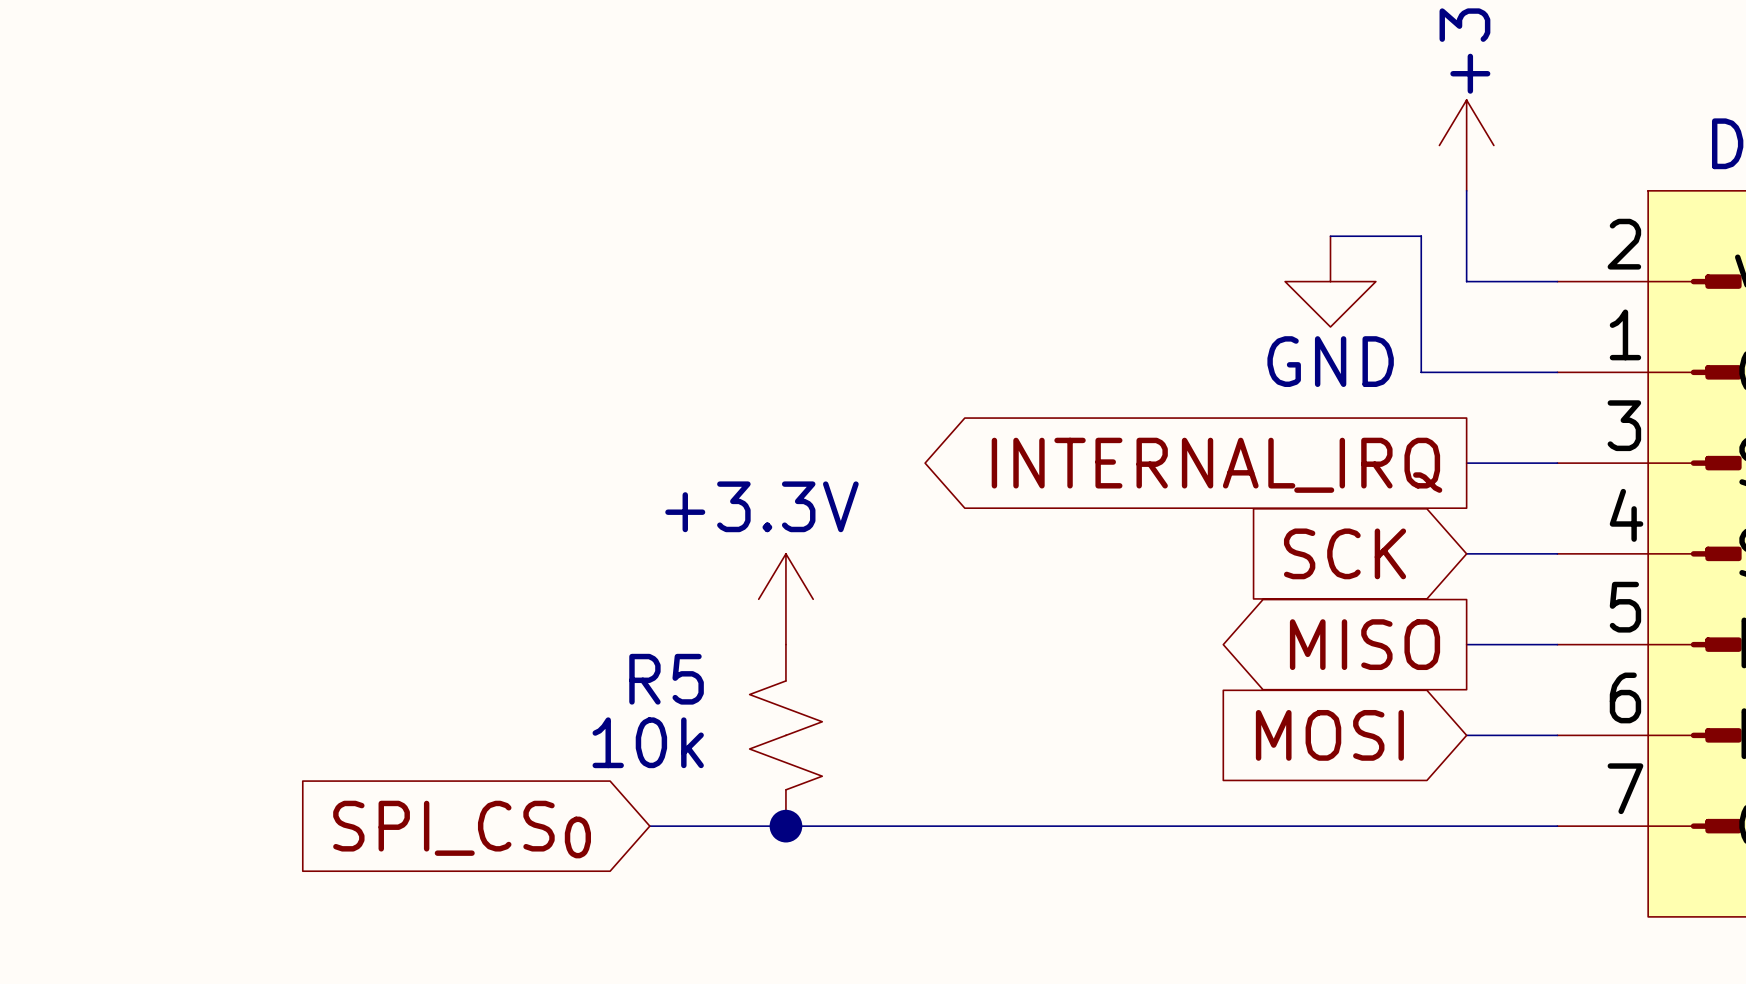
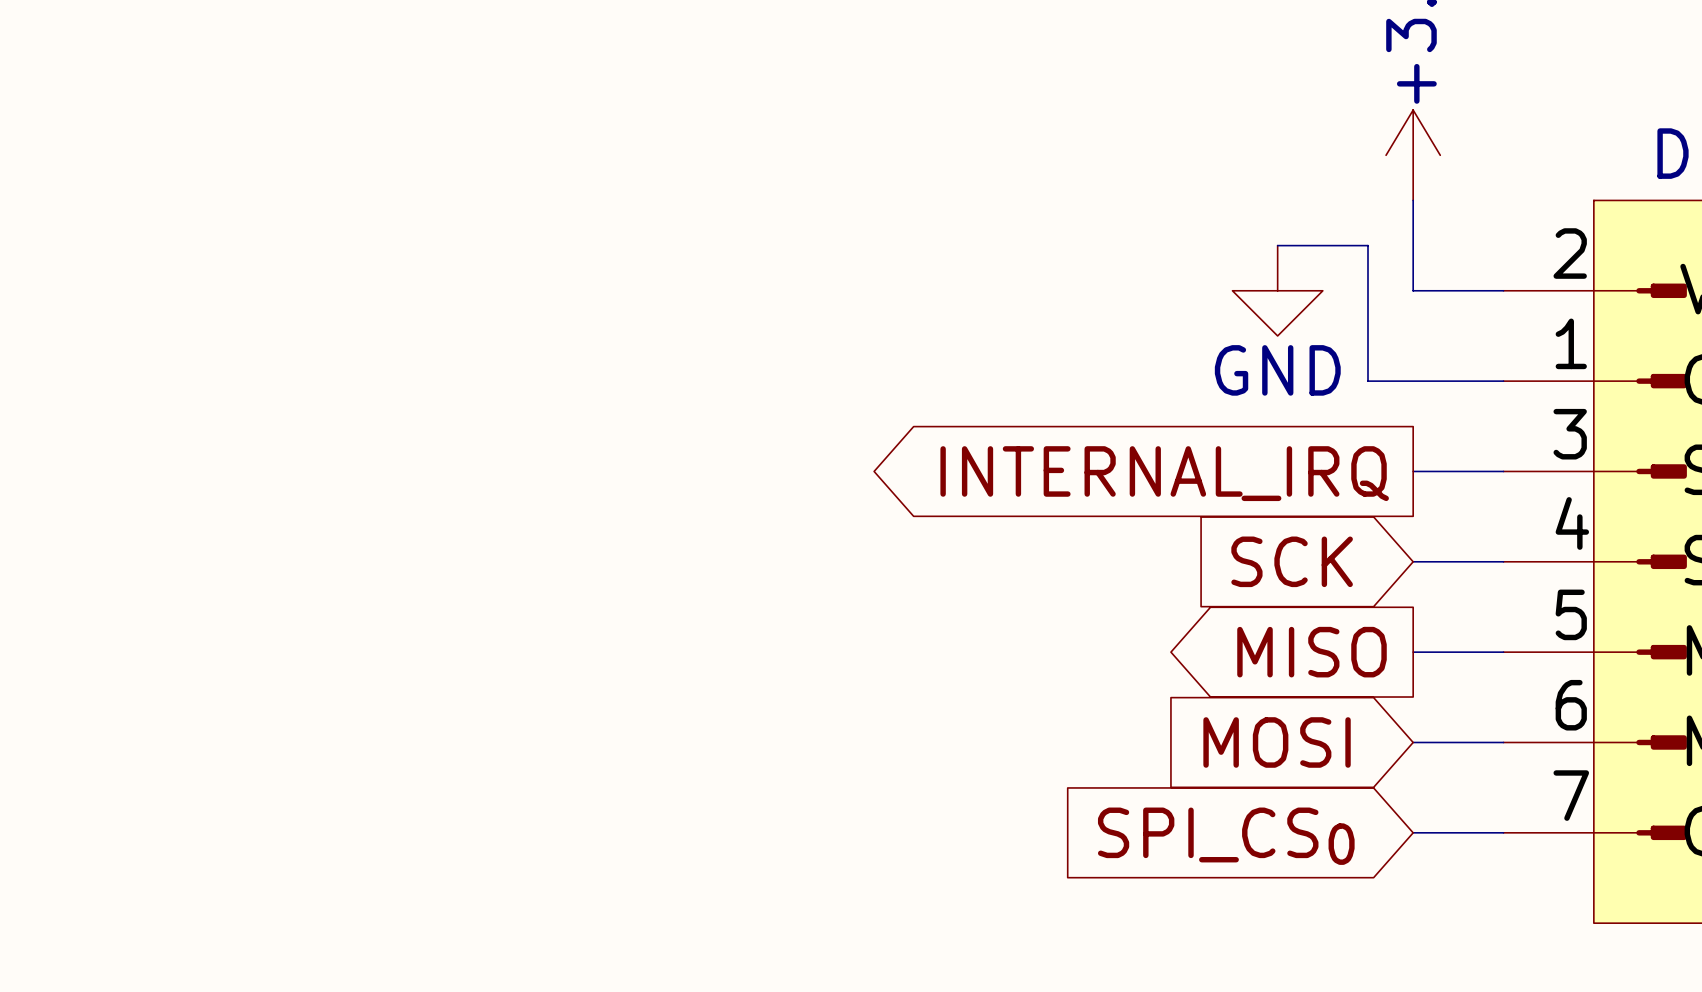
power symbol: +3.3V (785, 599) -> none
R5: 10k (785, 735) -> none
wire: (649, 826) (1466, 826) -> none
junction: (785, 826) -> none
global label position: SPI_CS0 (462, 829) -> SPI_CS0 (1226, 836)

